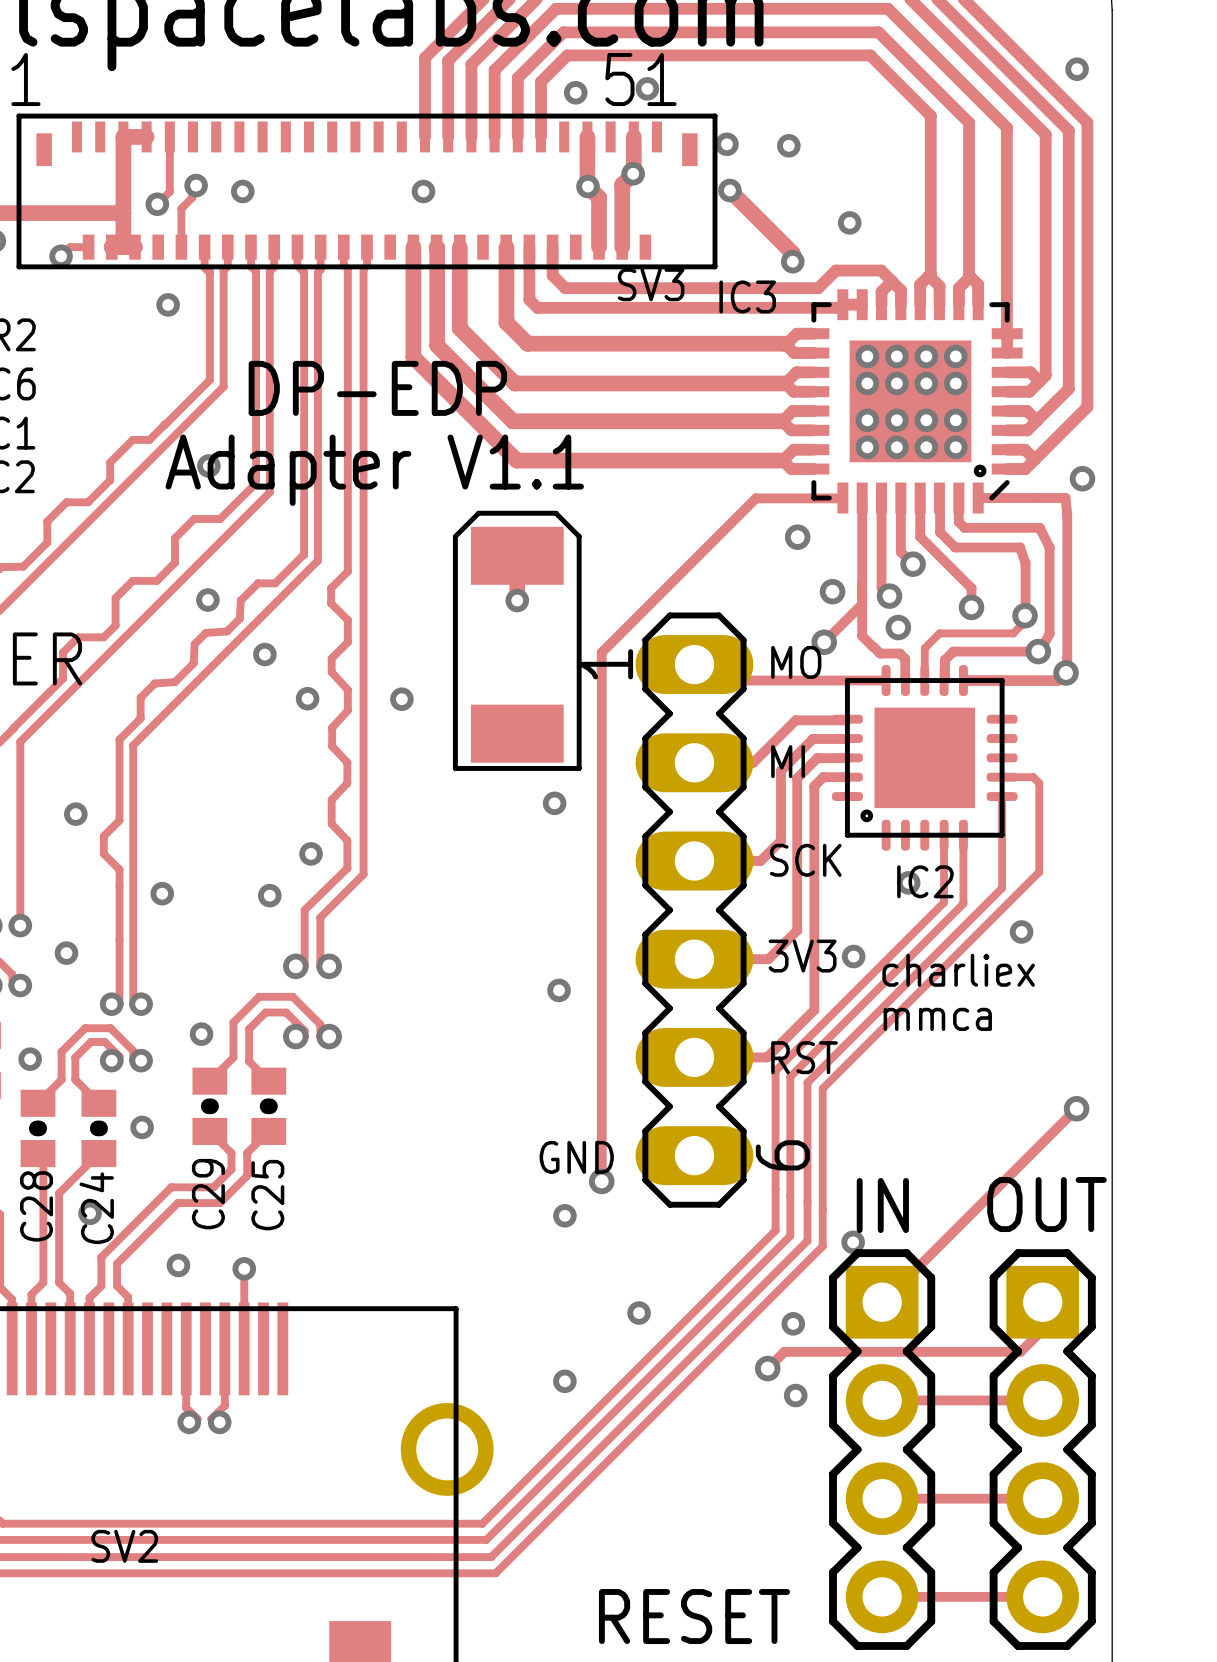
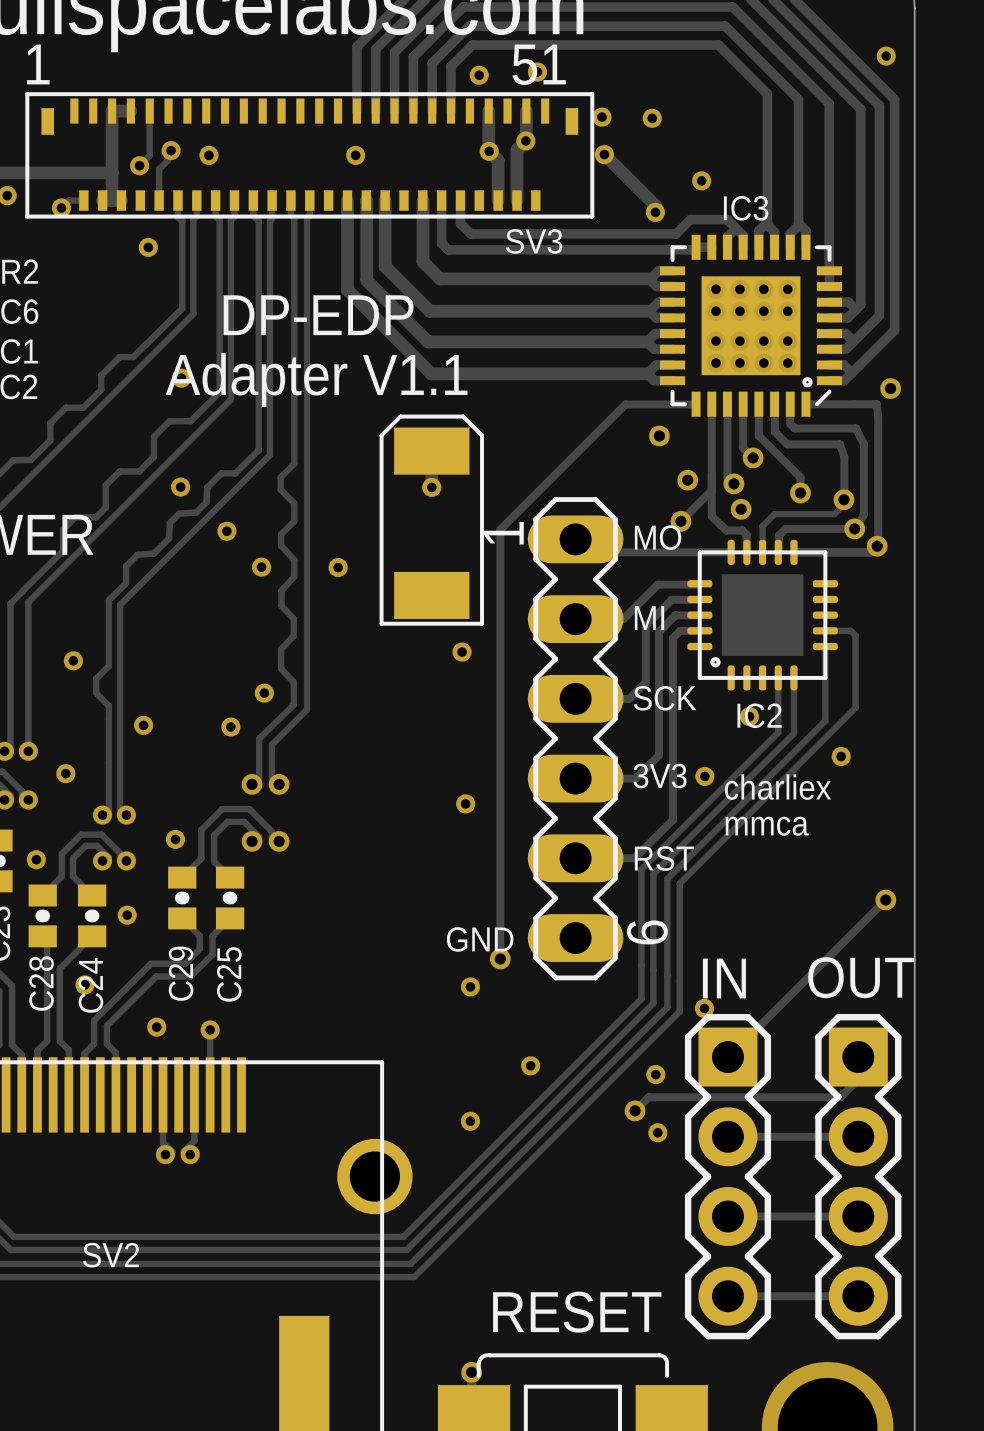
SV3 name position: SV3 (651, 284) -> SV3 (534, 241)
IC3 name position: IC3 (747, 296) -> IC3 (746, 208)

